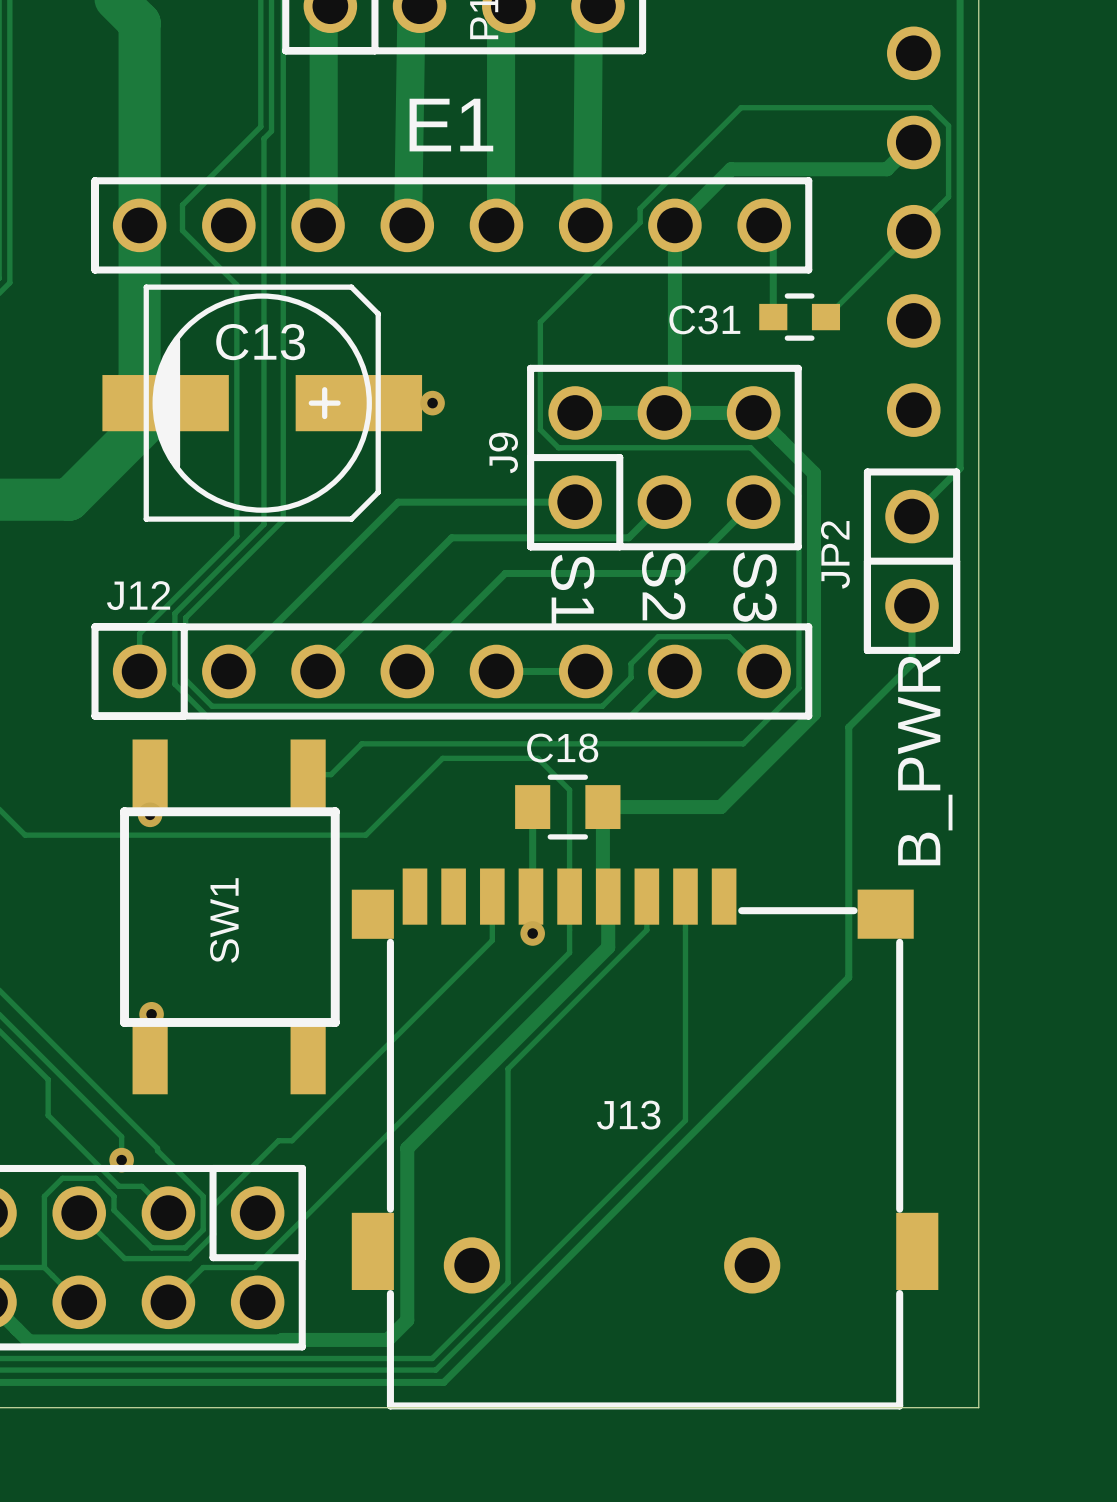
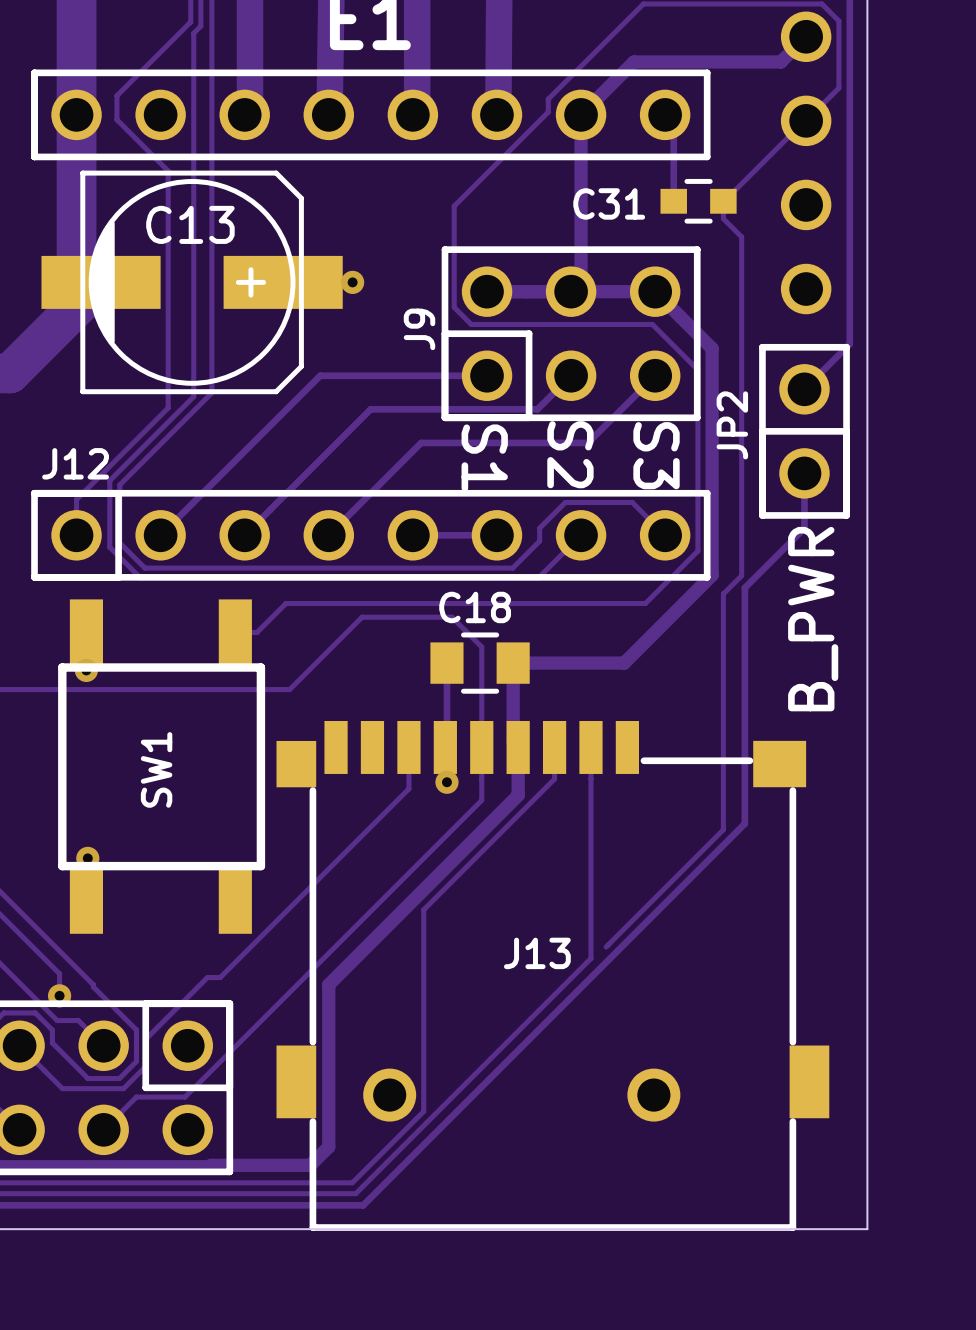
track: none -> (723, 201) (723, 218) (741, 237) (741, 575) (723, 593) (723, 829) (606, 947)

